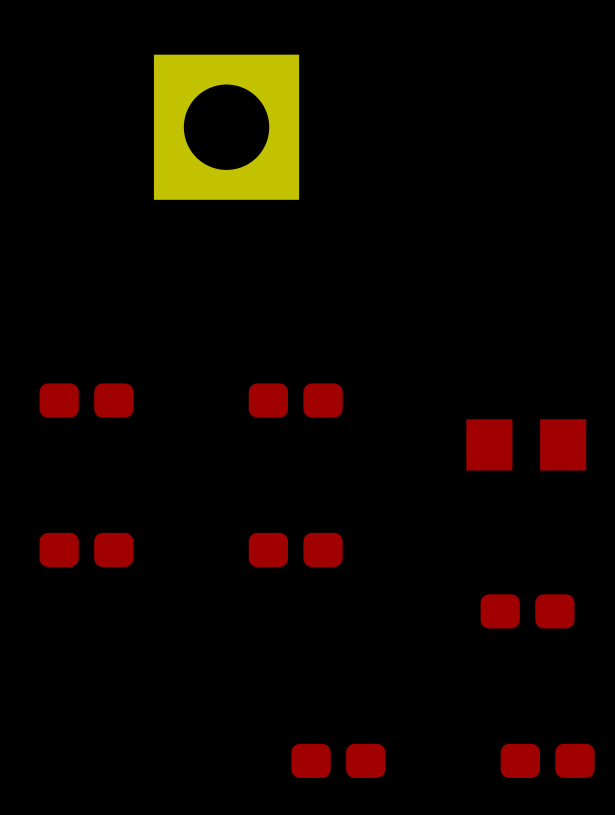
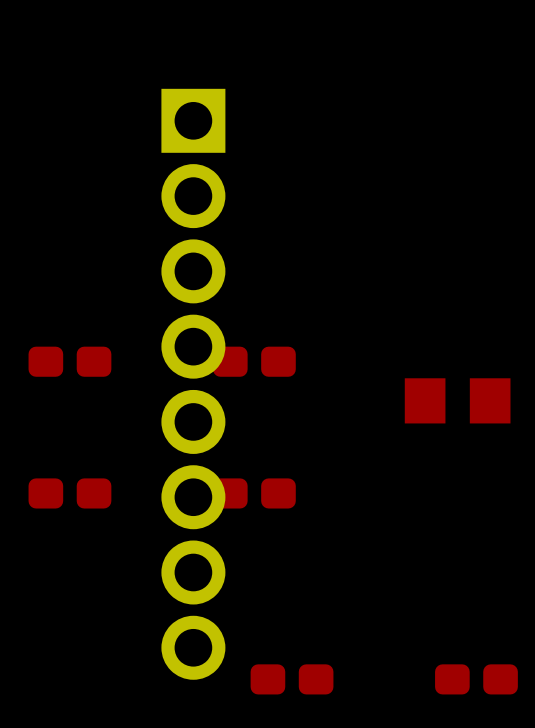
part: (226, 127) -> none
part: none -> (193, 384)
part: (527, 611) -> none

